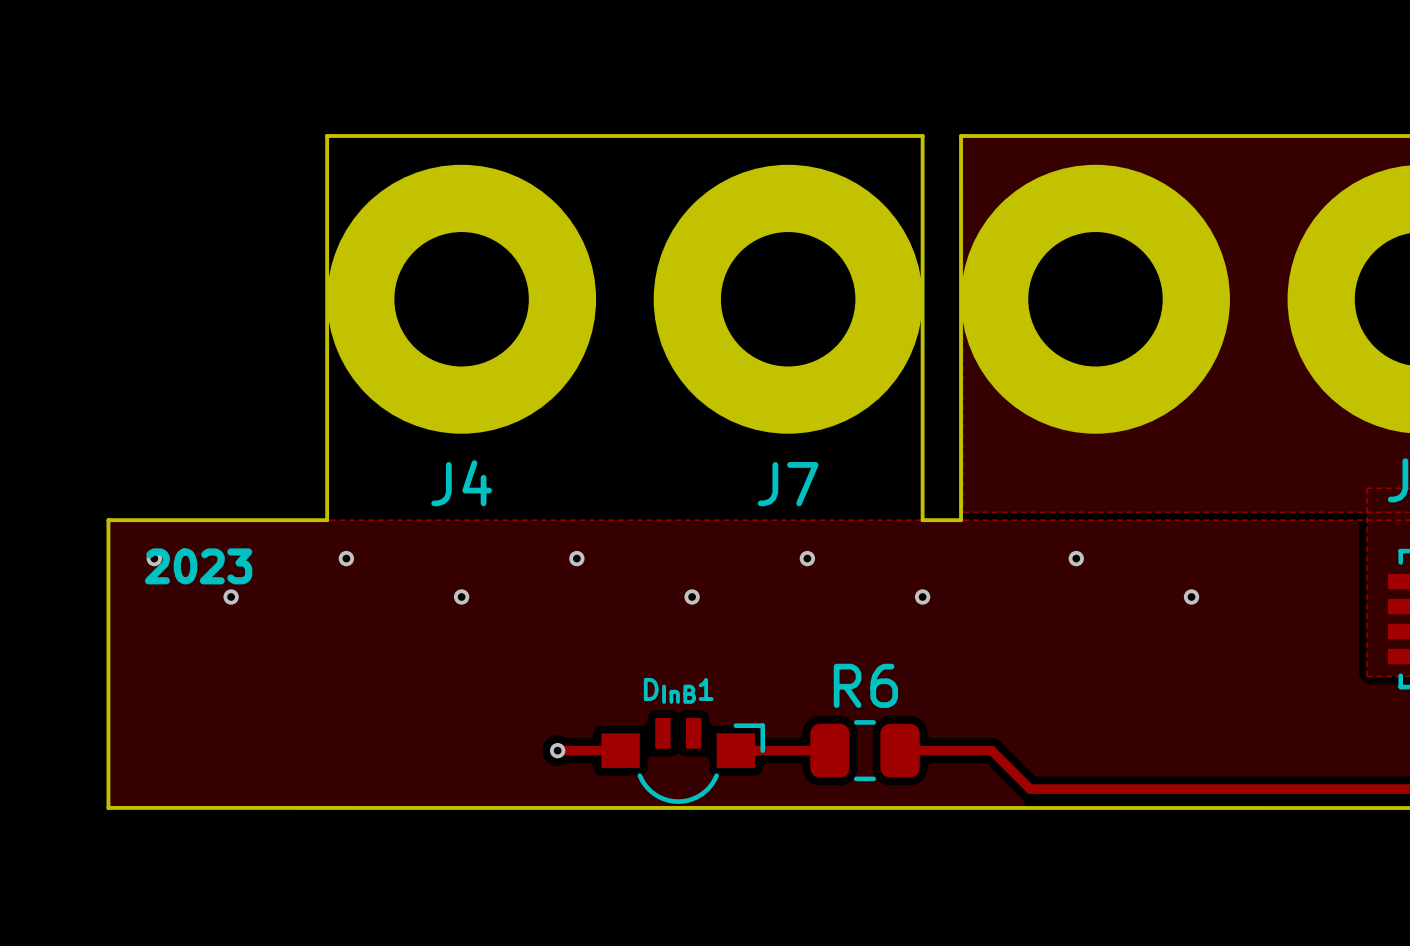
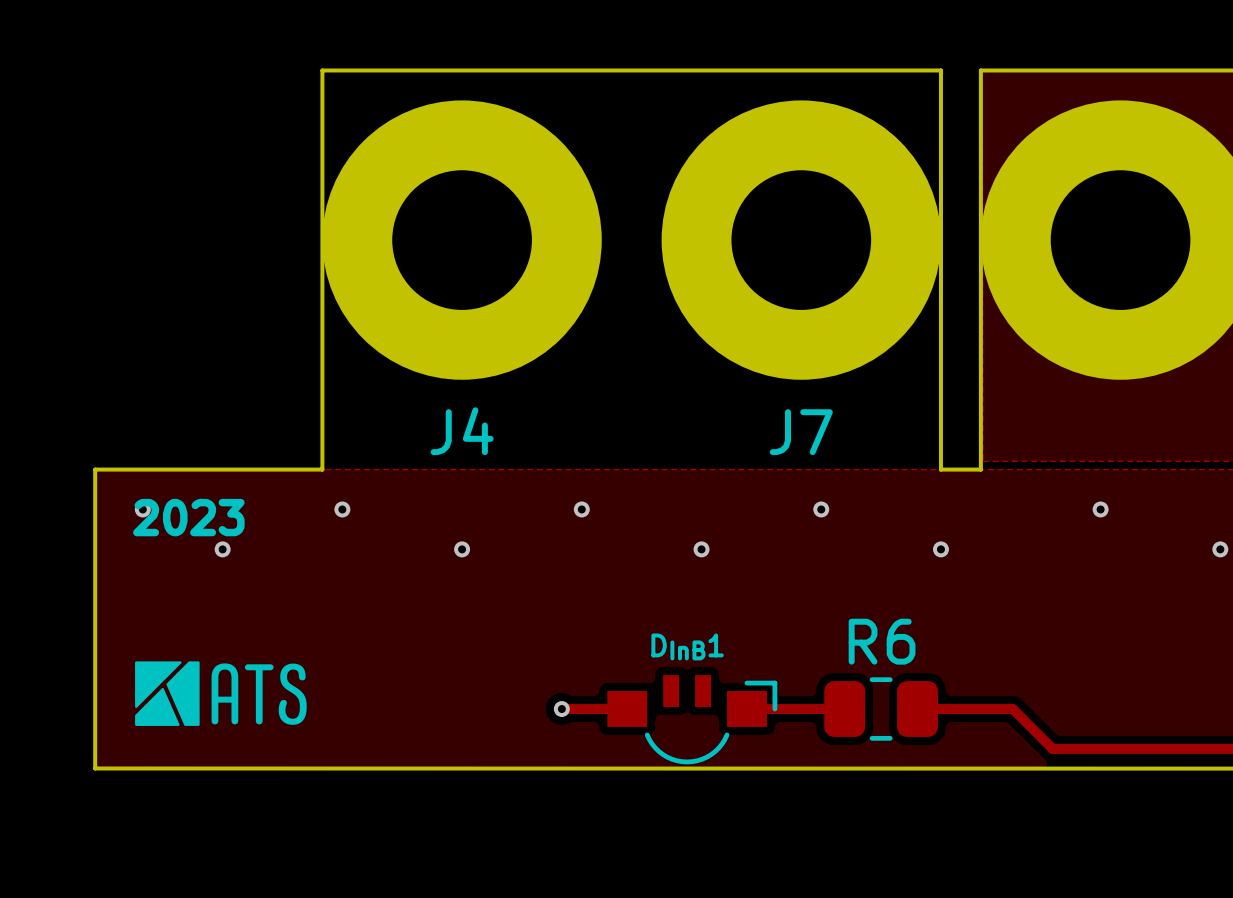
drawing: none -> [135, 661, 307, 726]

